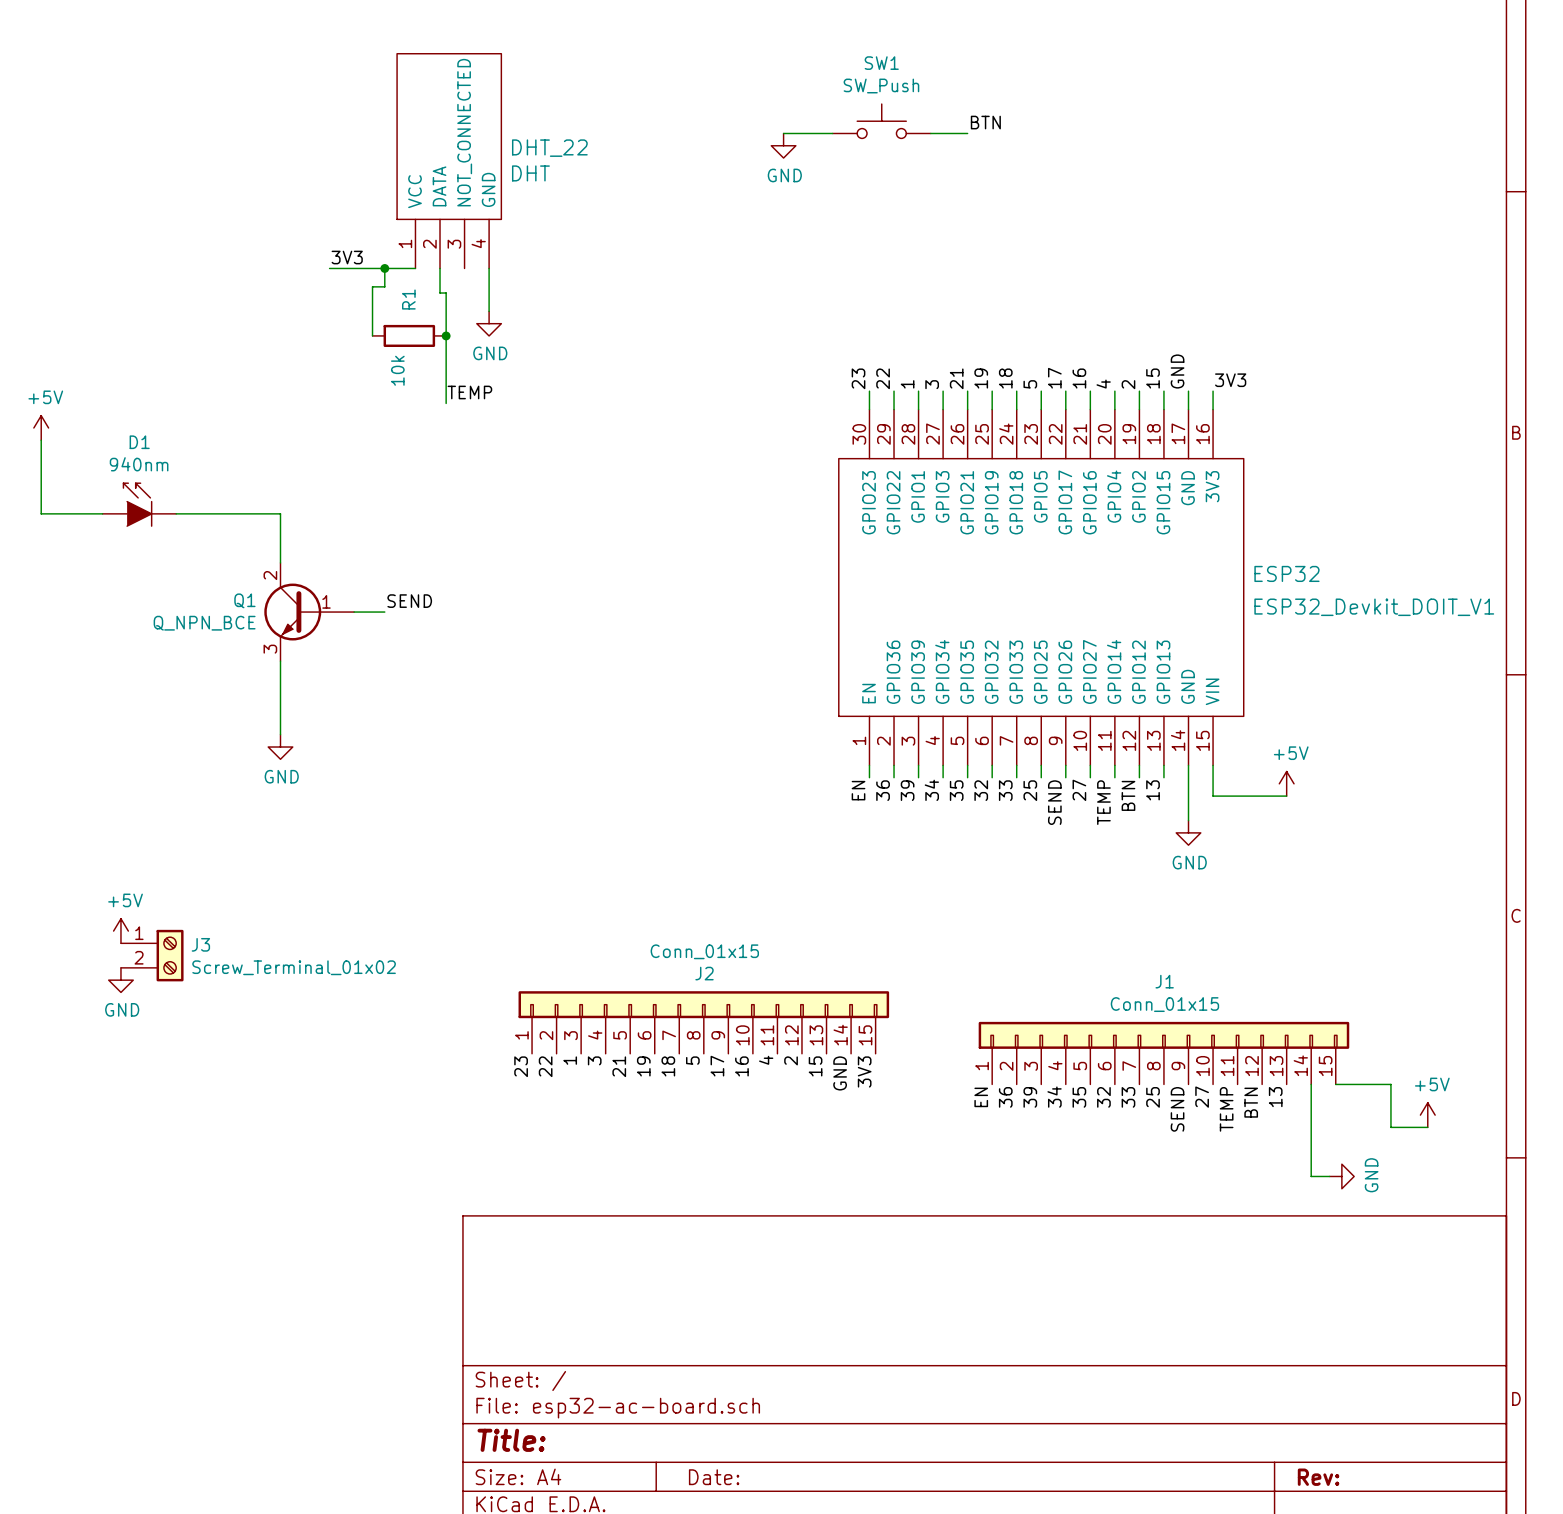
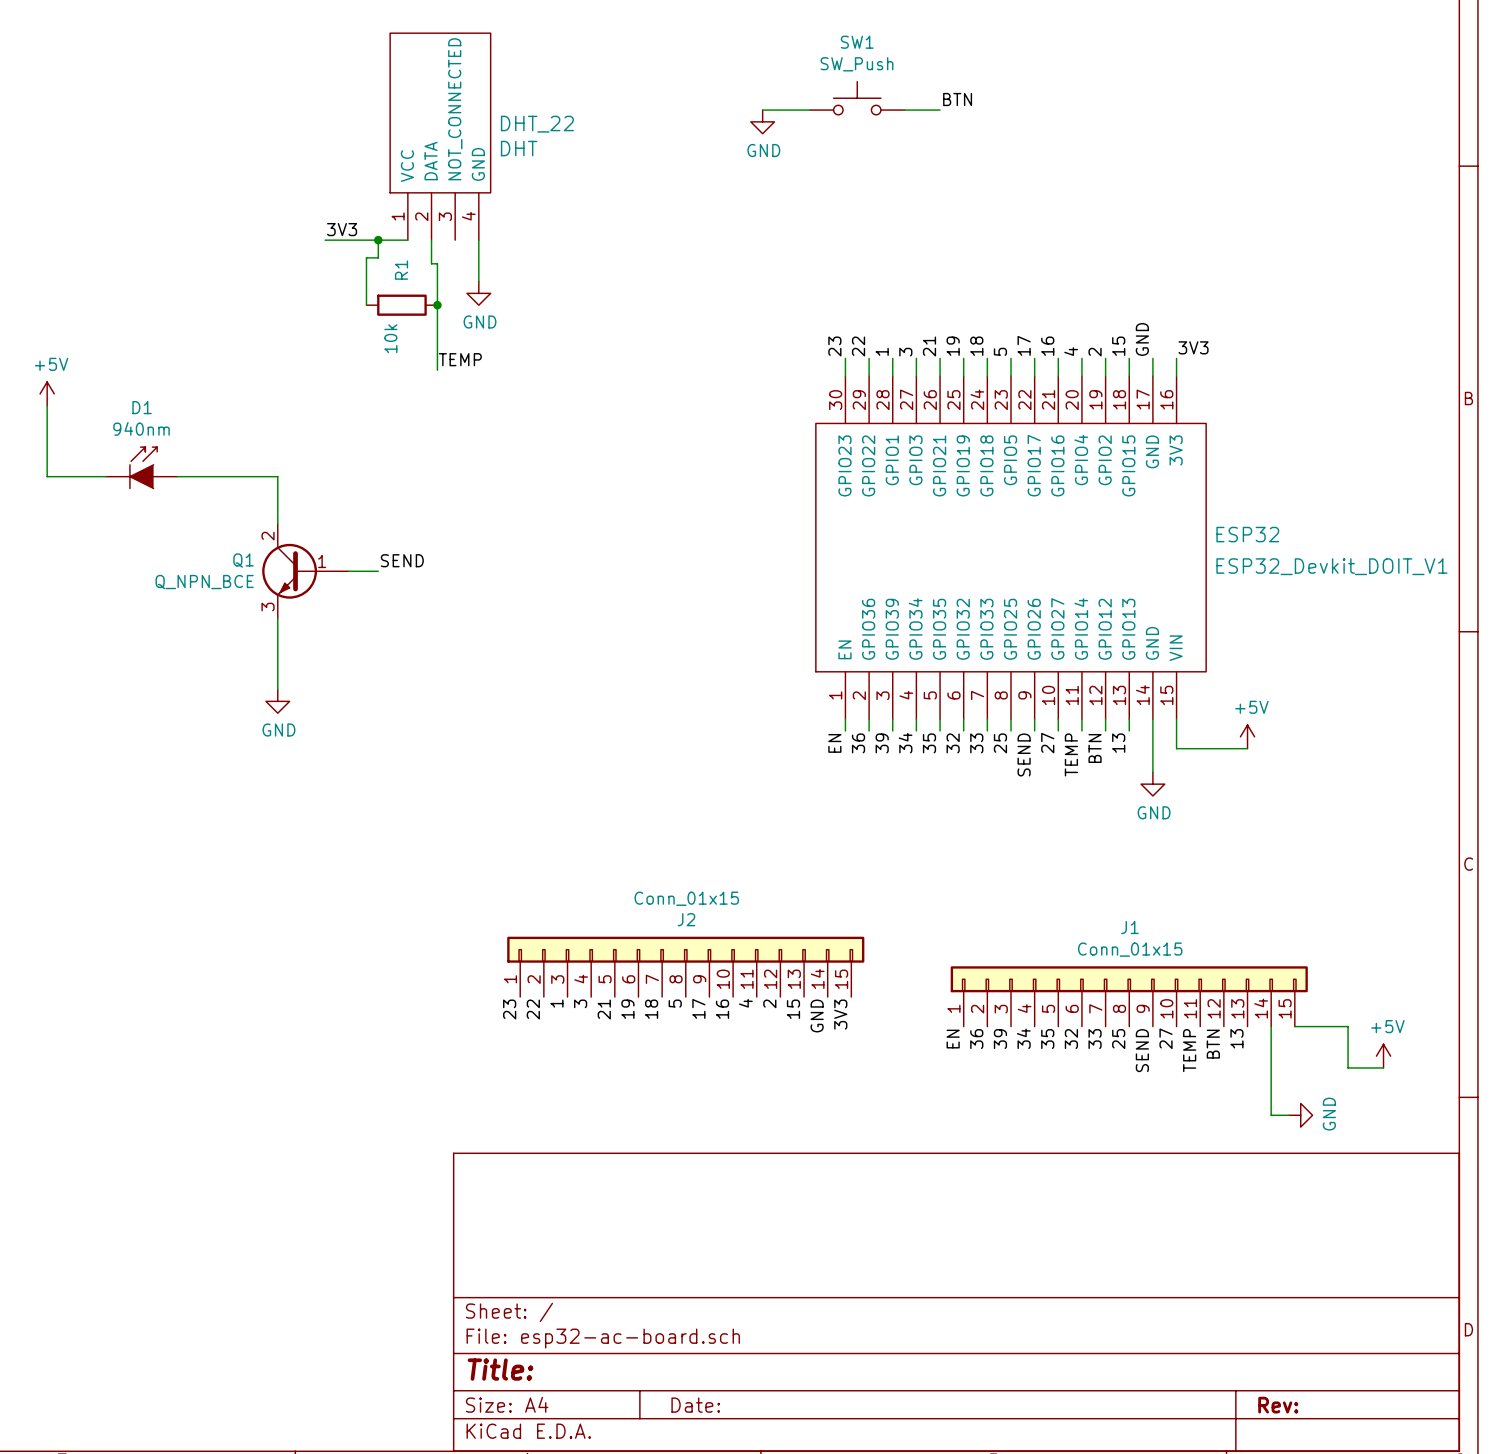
D1 flip: as is (137, 505) -> left-right (143, 468)
power symbol: +5V (120, 931) -> none
J3: Screw_Terminal_01x02 (152, 955) -> none
power symbol: GND (120, 980) -> none

